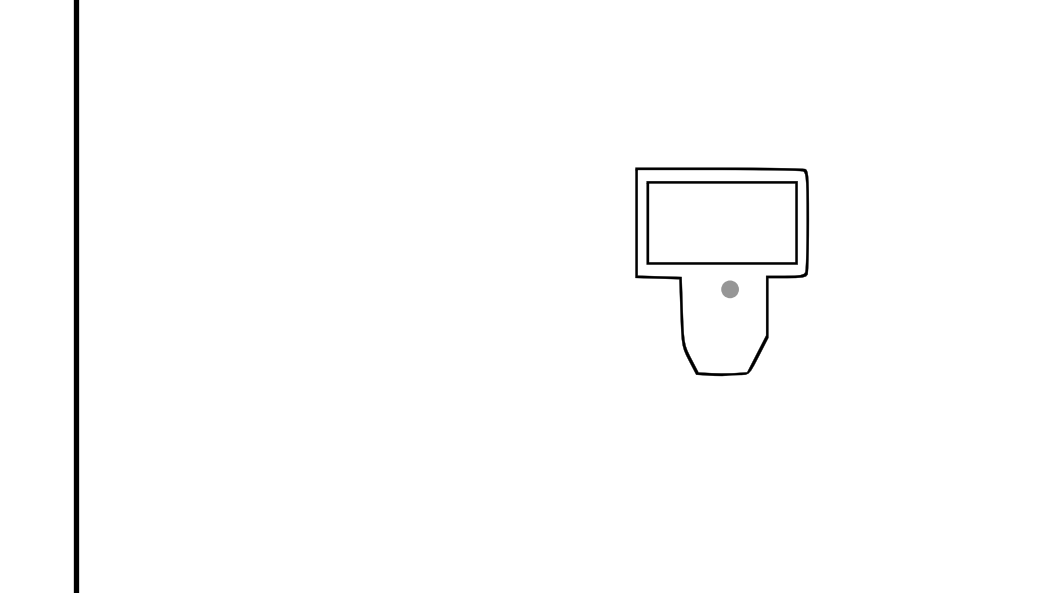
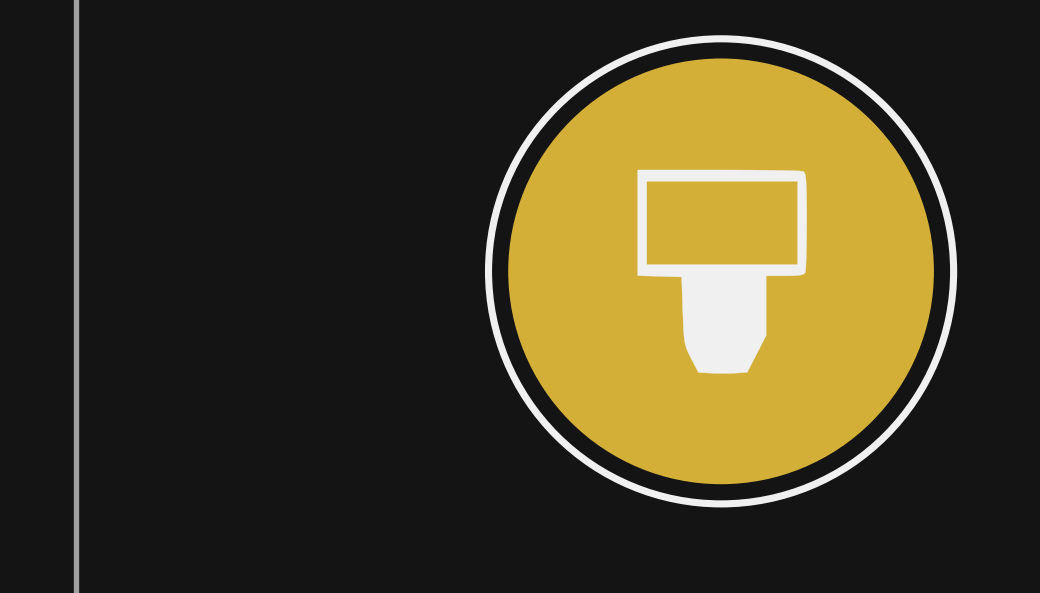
drawing shape: [635, 167, 810, 377] -> [484, 35, 958, 508]
part footprint: [721, 280, 739, 299] -> [508, 58, 934, 485]

